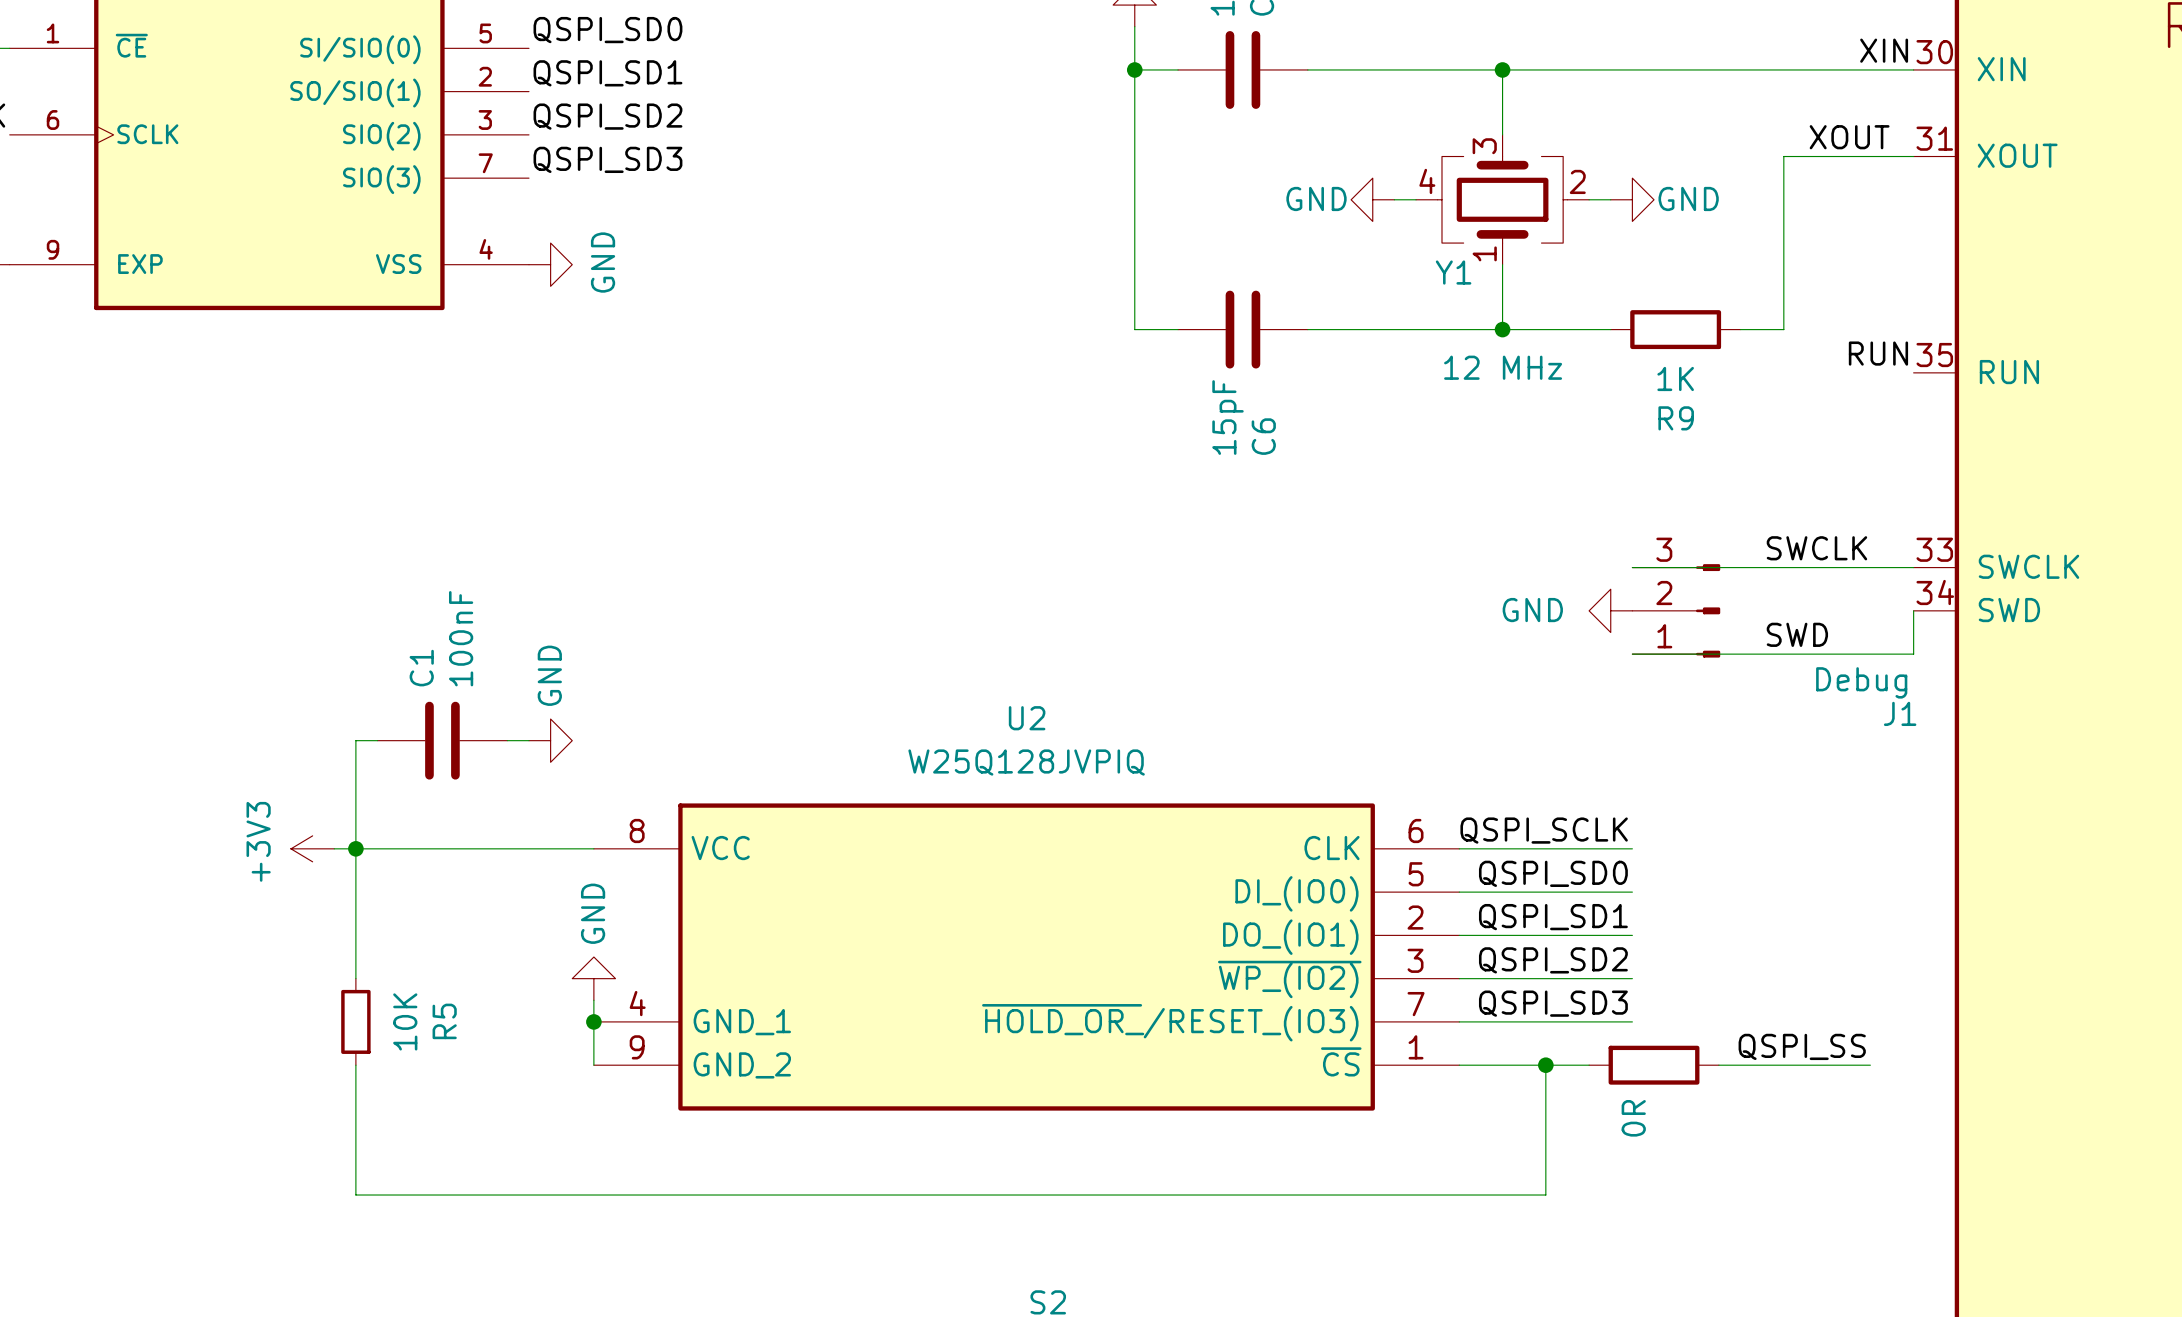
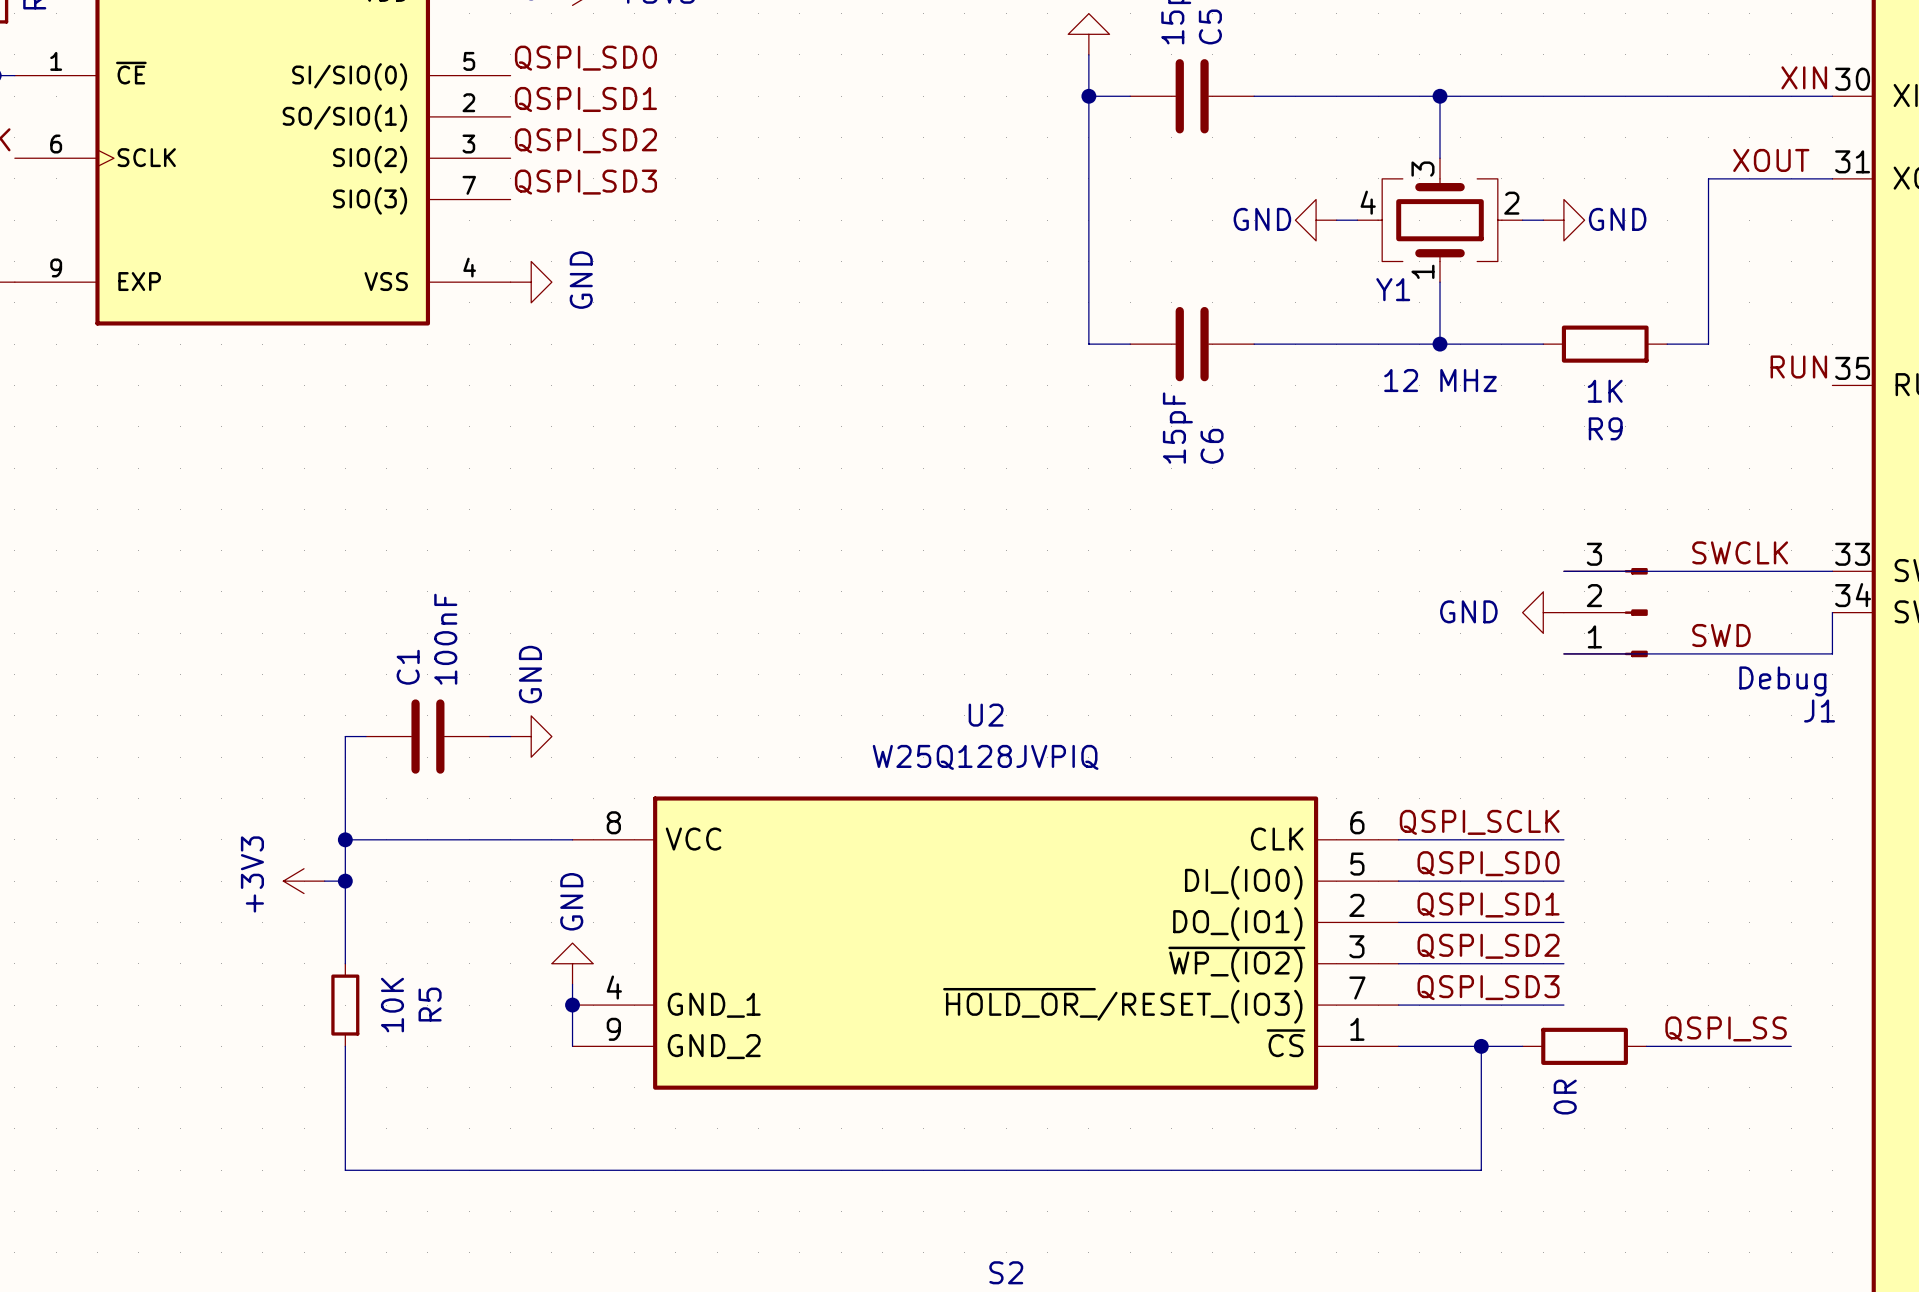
power symbol position: +3V3 (312, 848) -> +3V3 (304, 881)
wire: (334, 848) (355, 848) -> (324, 881) (345, 881)
junction: none -> (345, 881)

